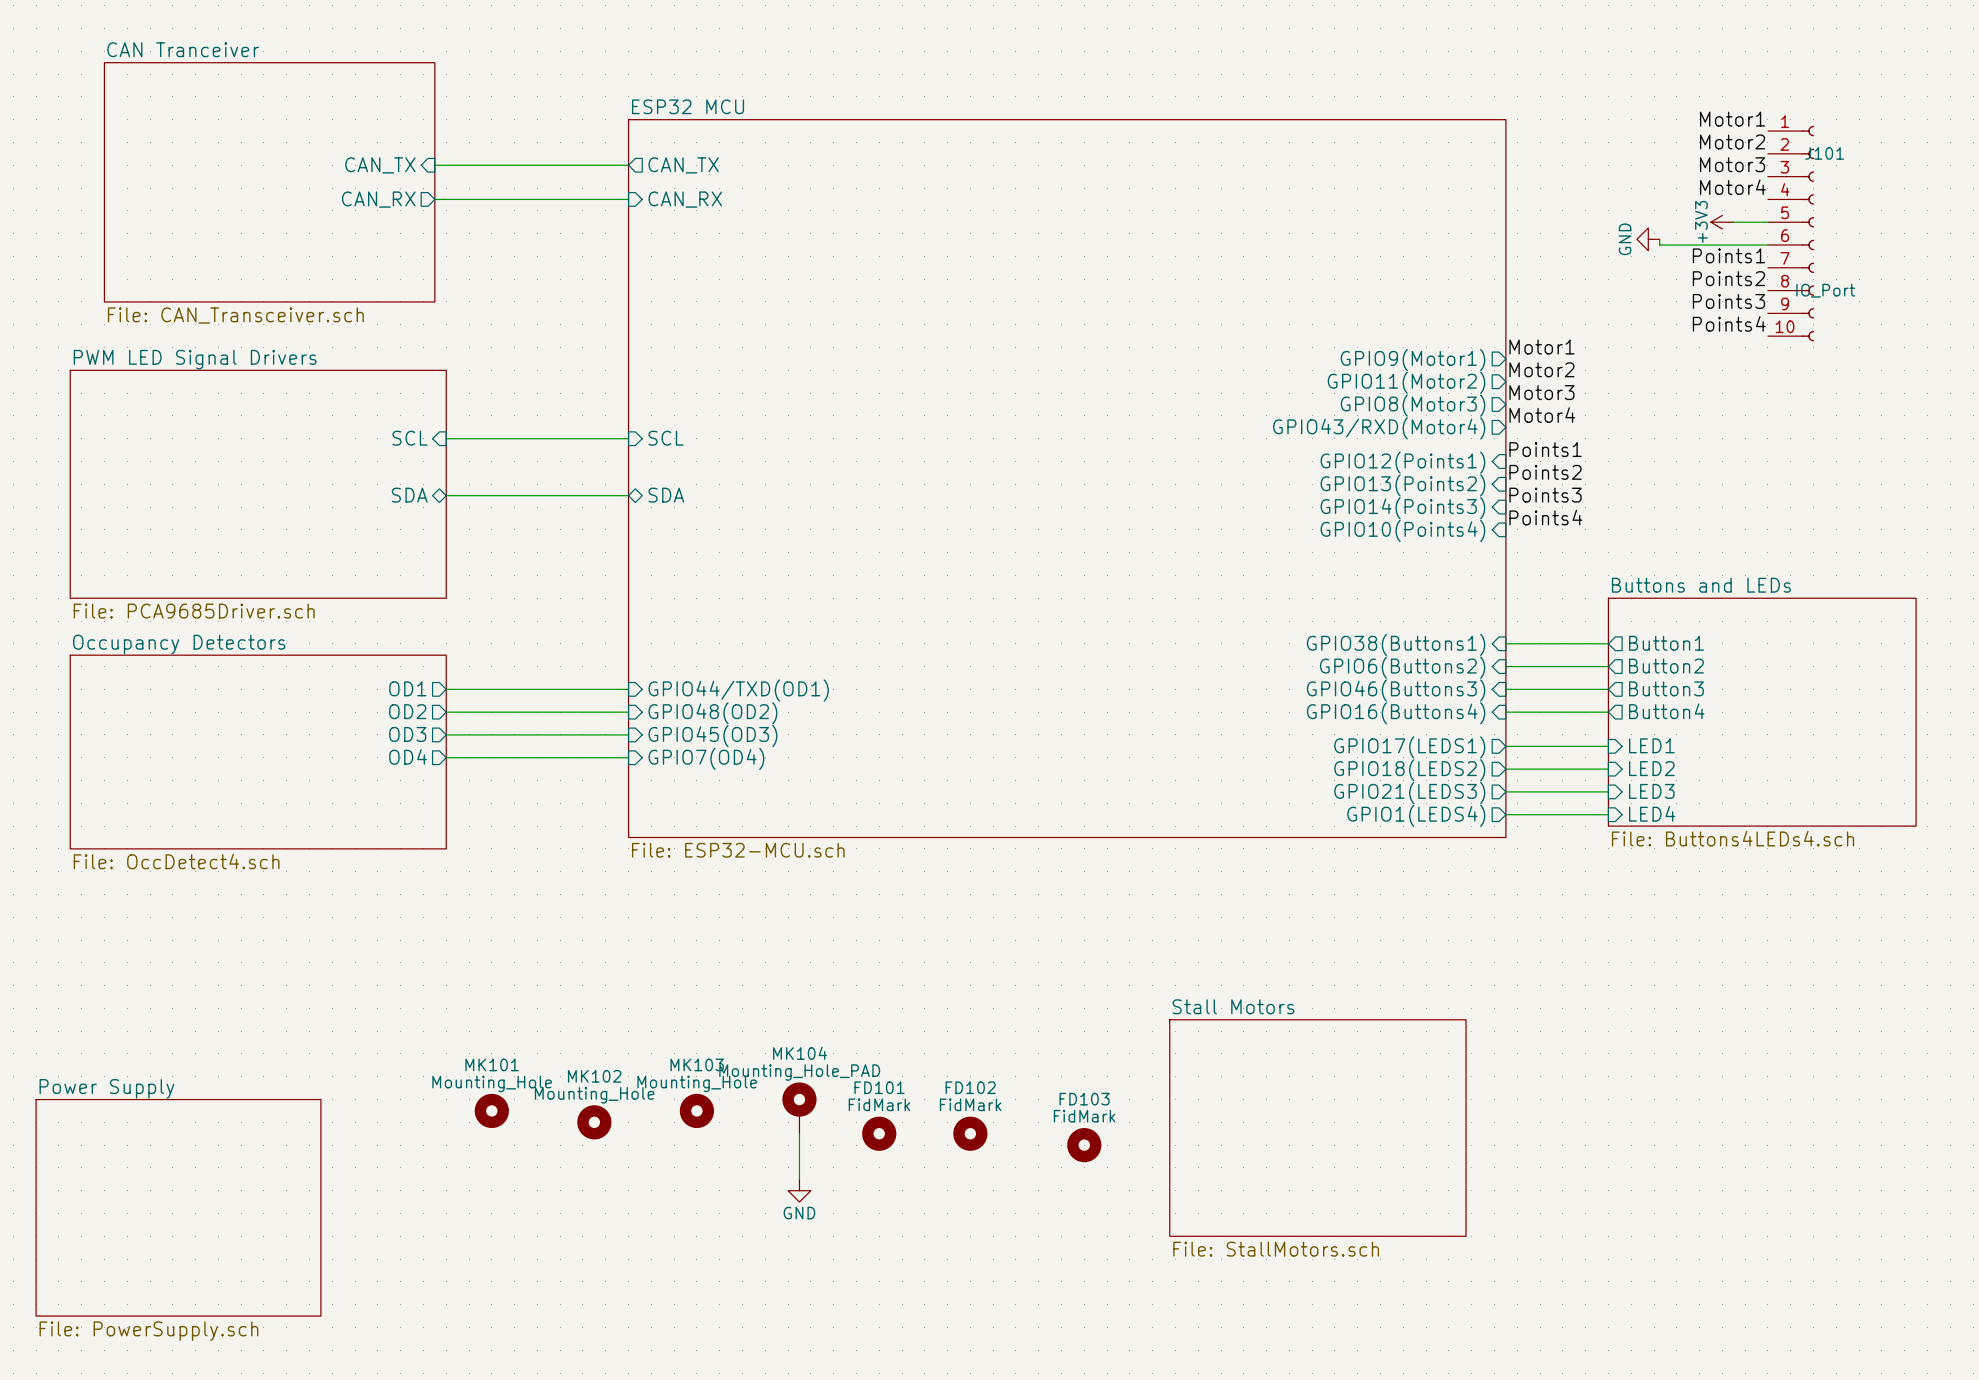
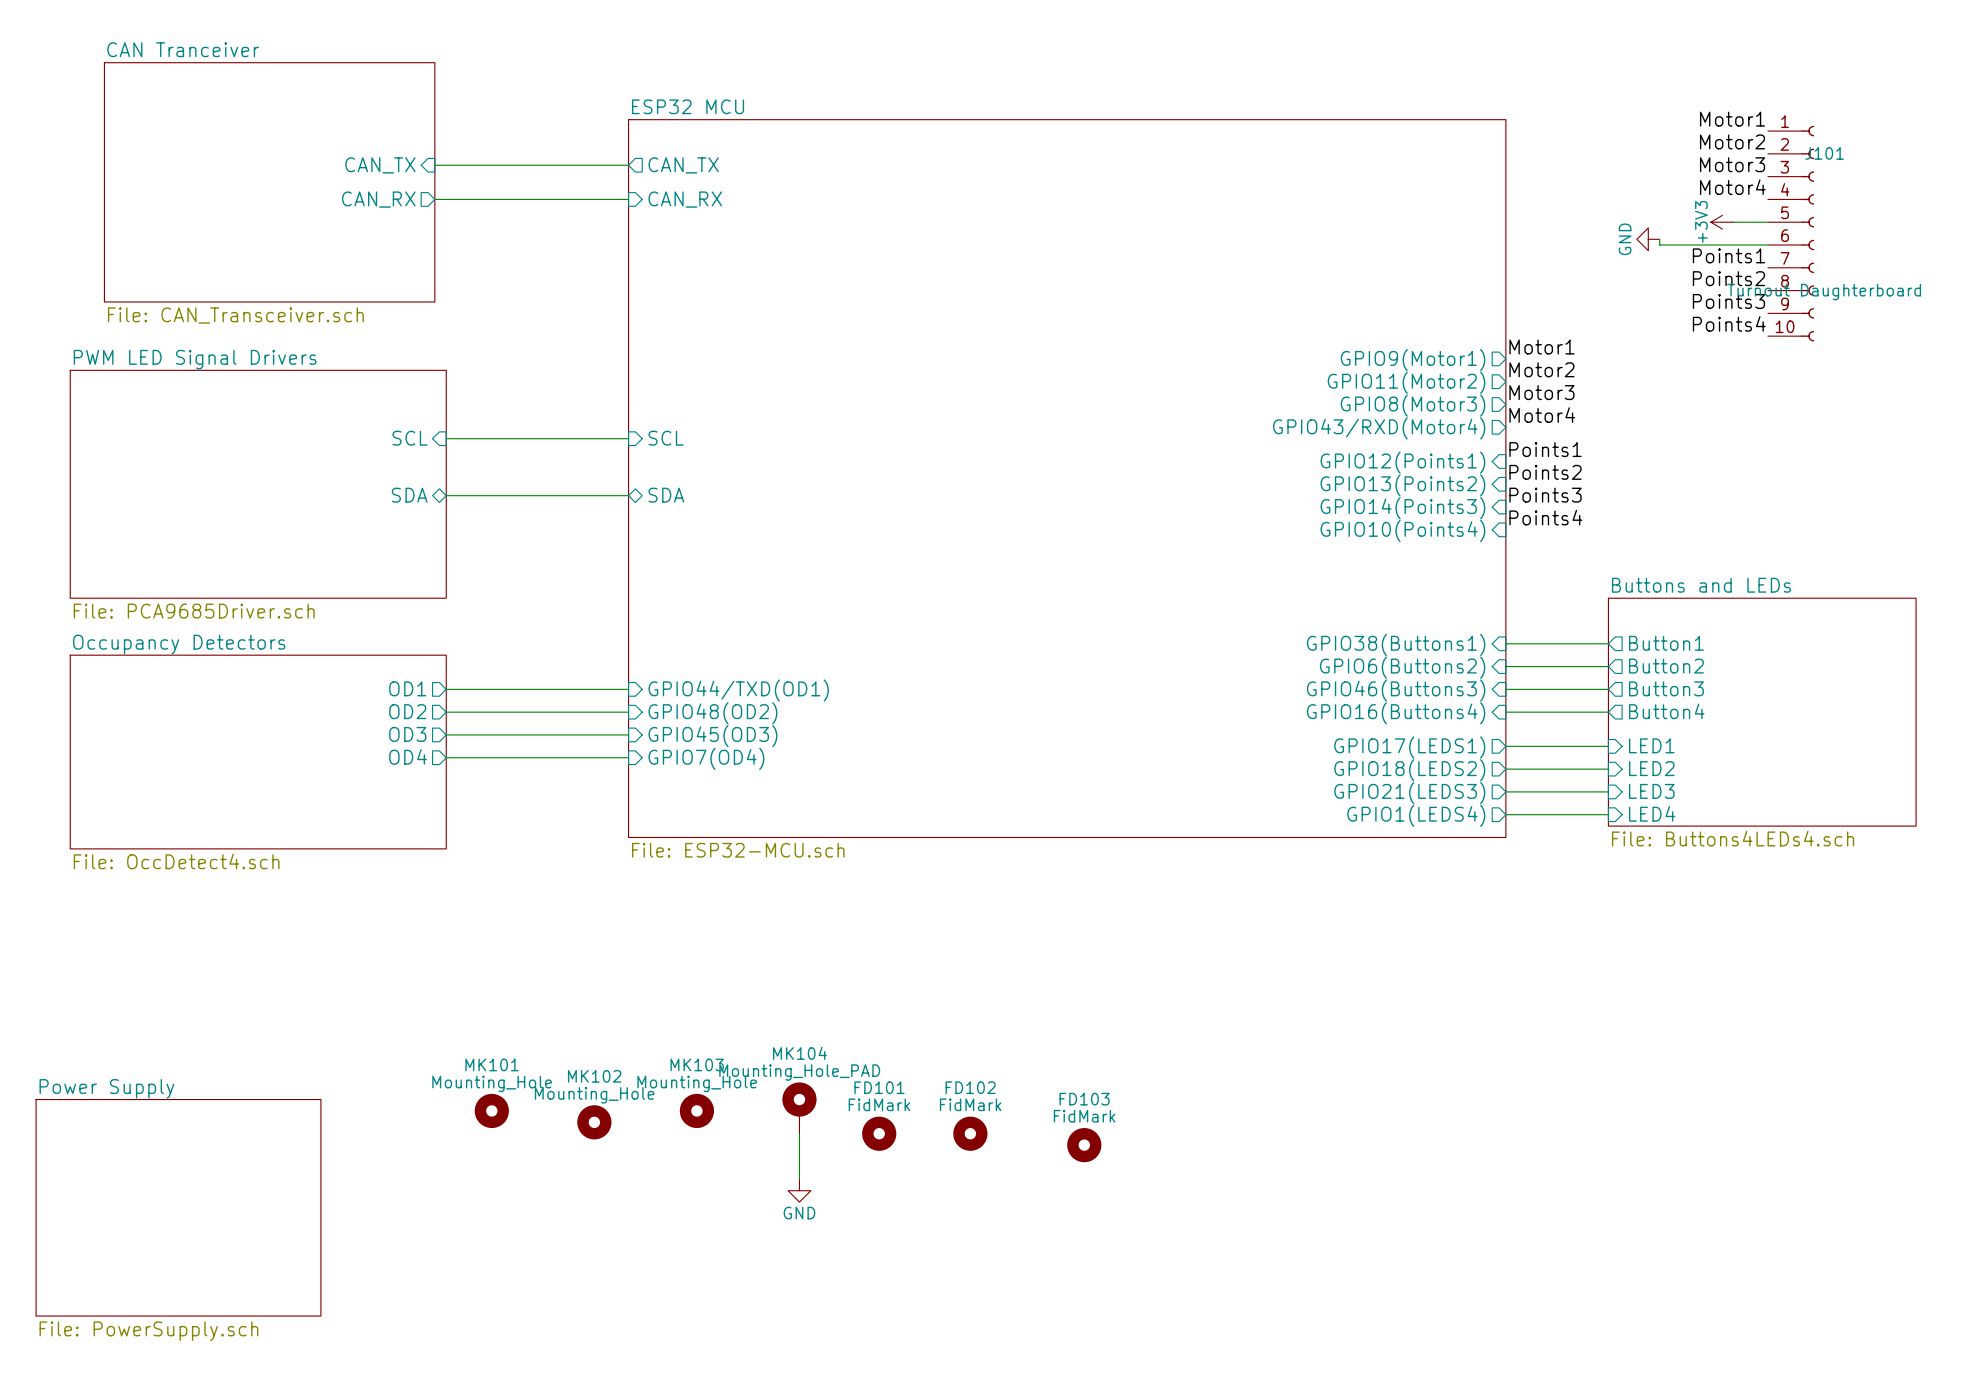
J101 value: IO_Port (1825, 290) -> Turnout Daughterboard (1824, 292)
sheet Stall Motors: File: StallMotors.sch (1317, 1128) -> none

